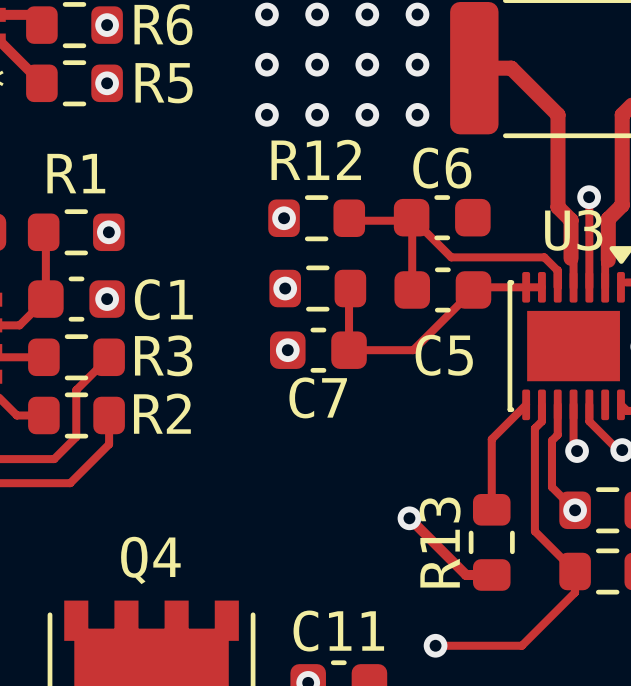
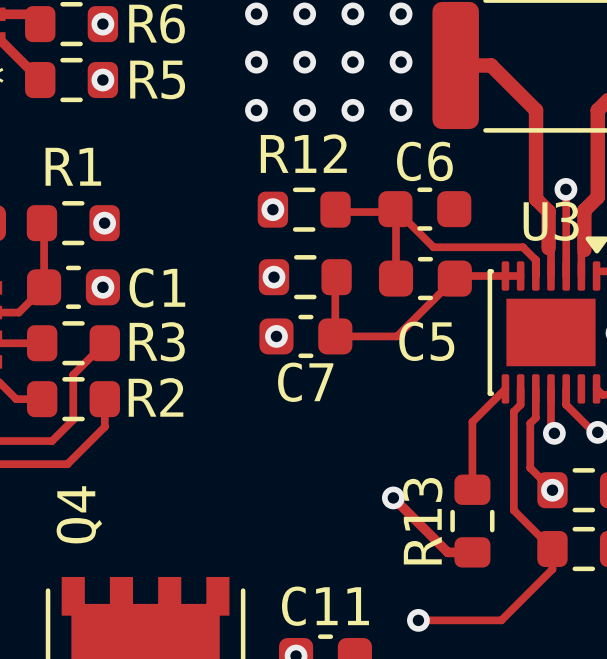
Q4 name rotation: 0° (150, 560) -> 90° counterclockwise (79, 514)

